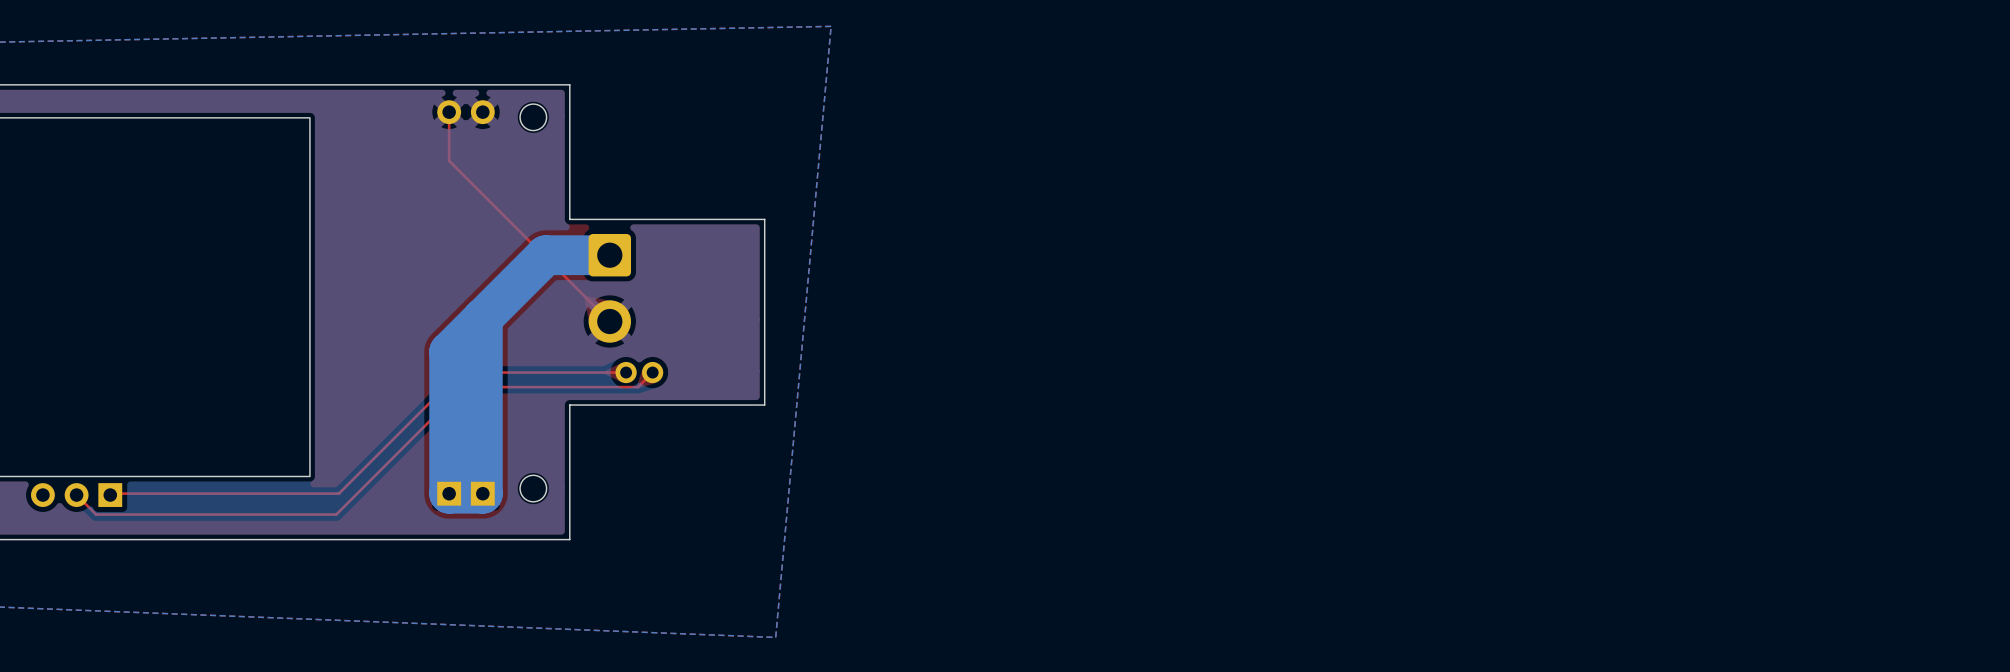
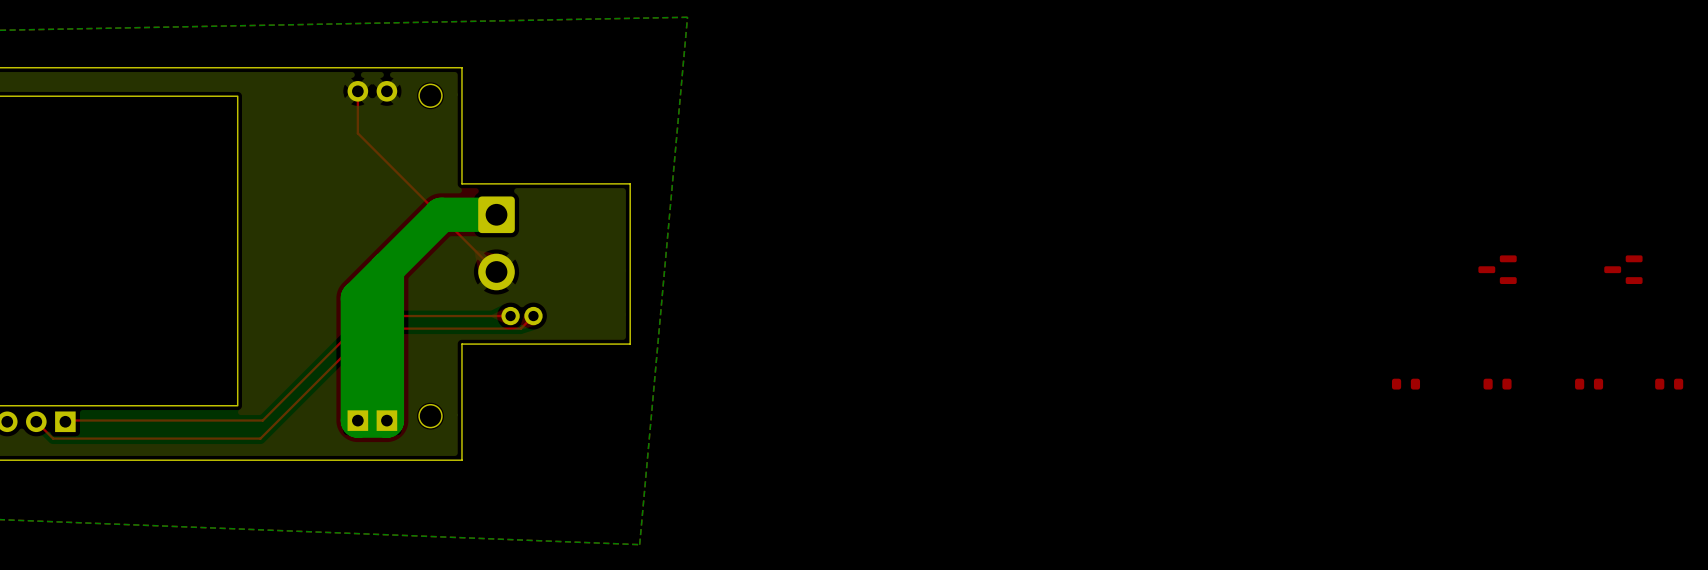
part: none -> (1497, 269)
part: none -> (1623, 269)
part: none -> (1406, 384)
part: none -> (1497, 384)
part: none -> (1589, 384)
part: none -> (1669, 384)

